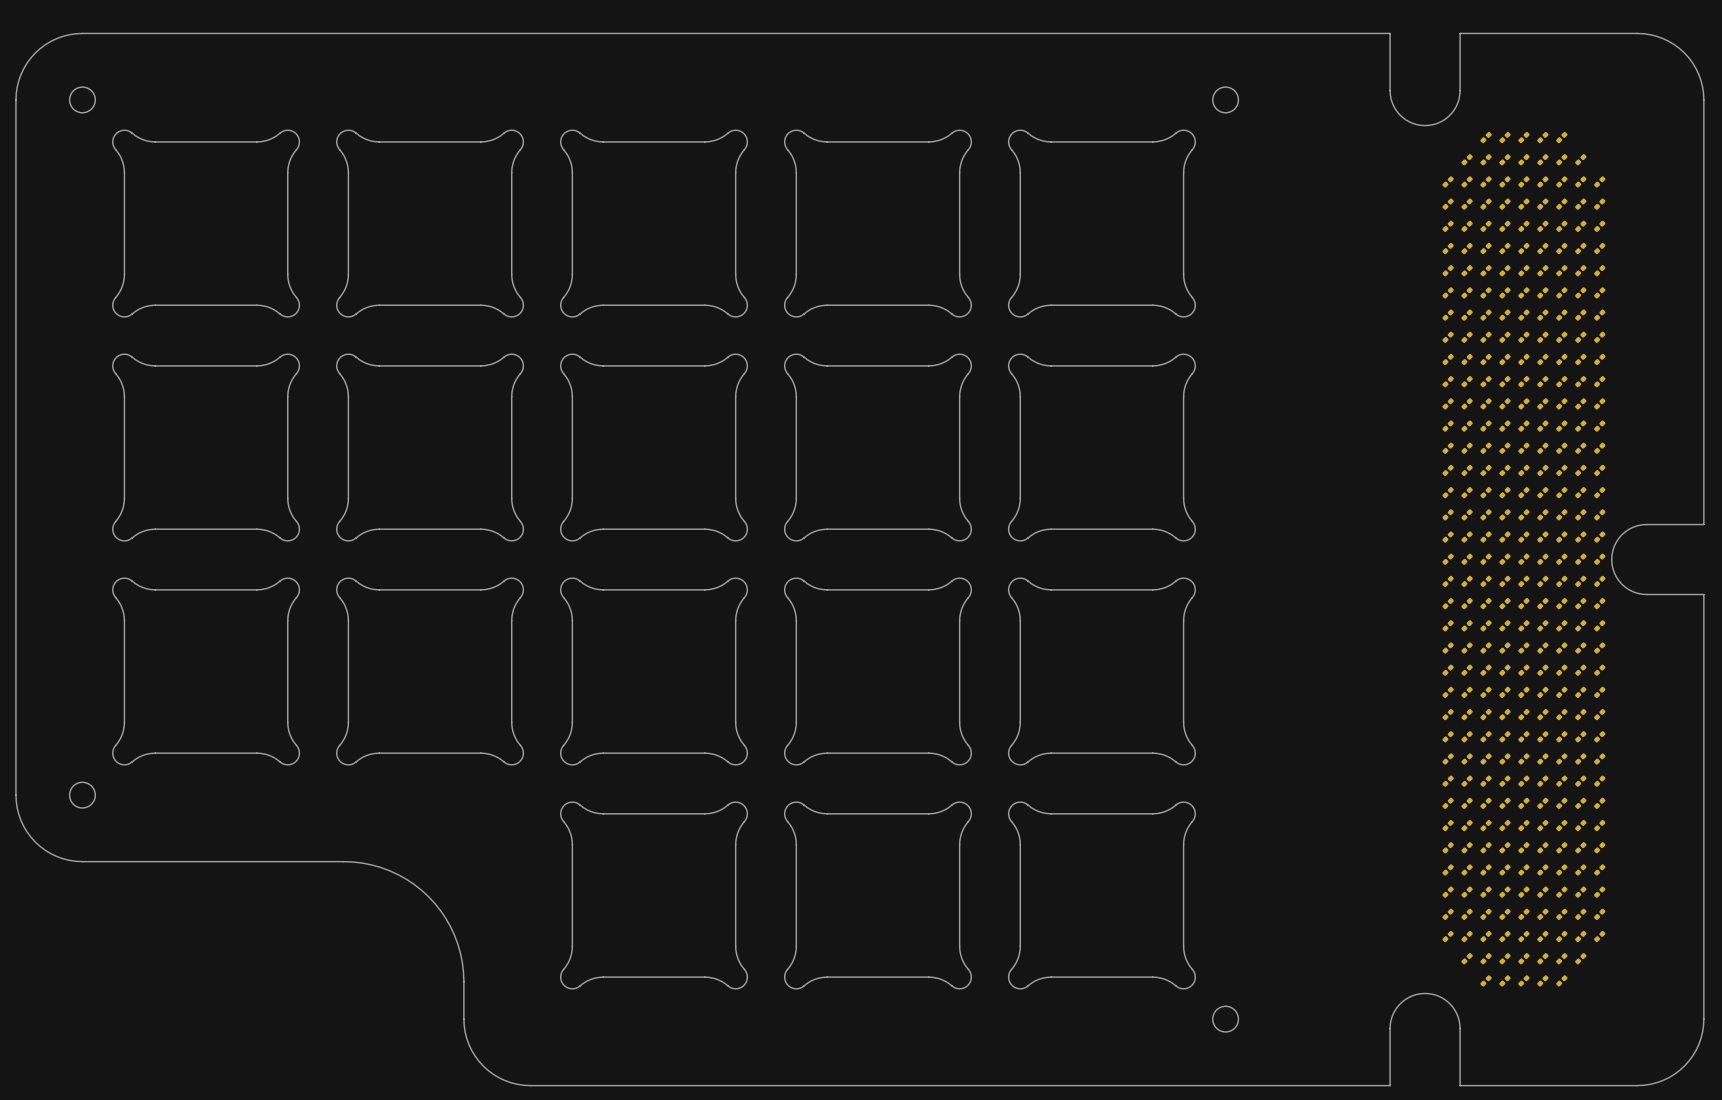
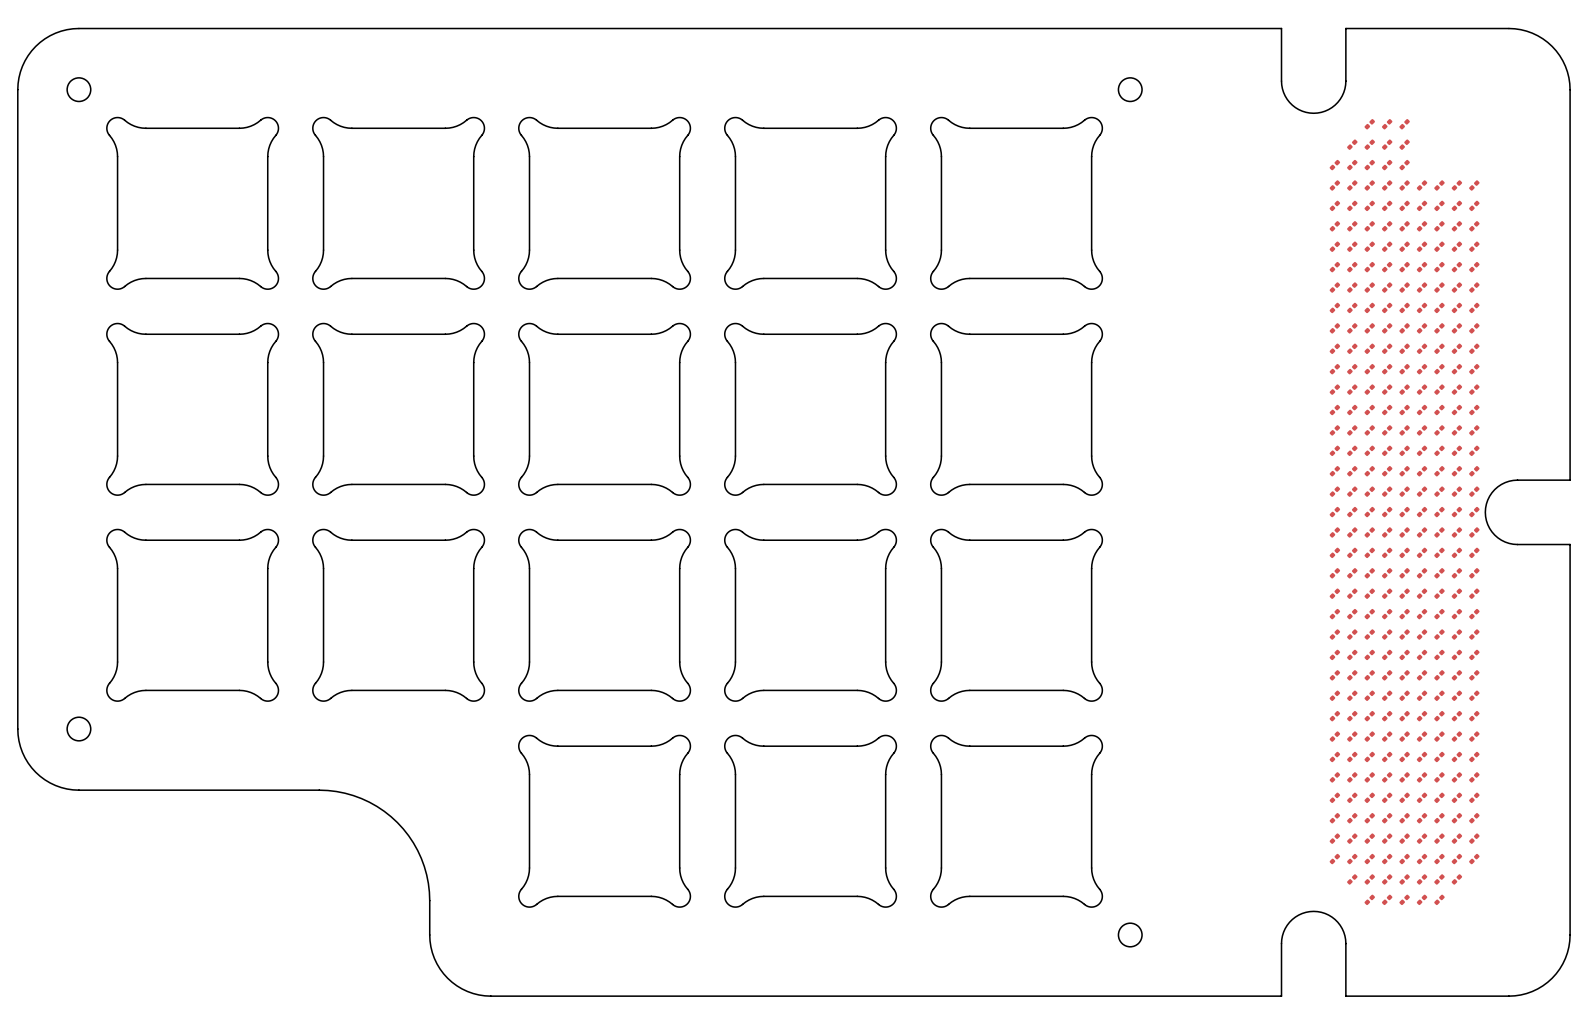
part: (1542, 137) -> none
part: (1561, 137) -> none
part: (1542, 159) -> none
part: (1561, 159) -> none
part: (1580, 159) -> none
part: (1542, 181) -> none
part: (1561, 181) -> none
part: (1580, 181) -> none
part: (1599, 181) -> none

